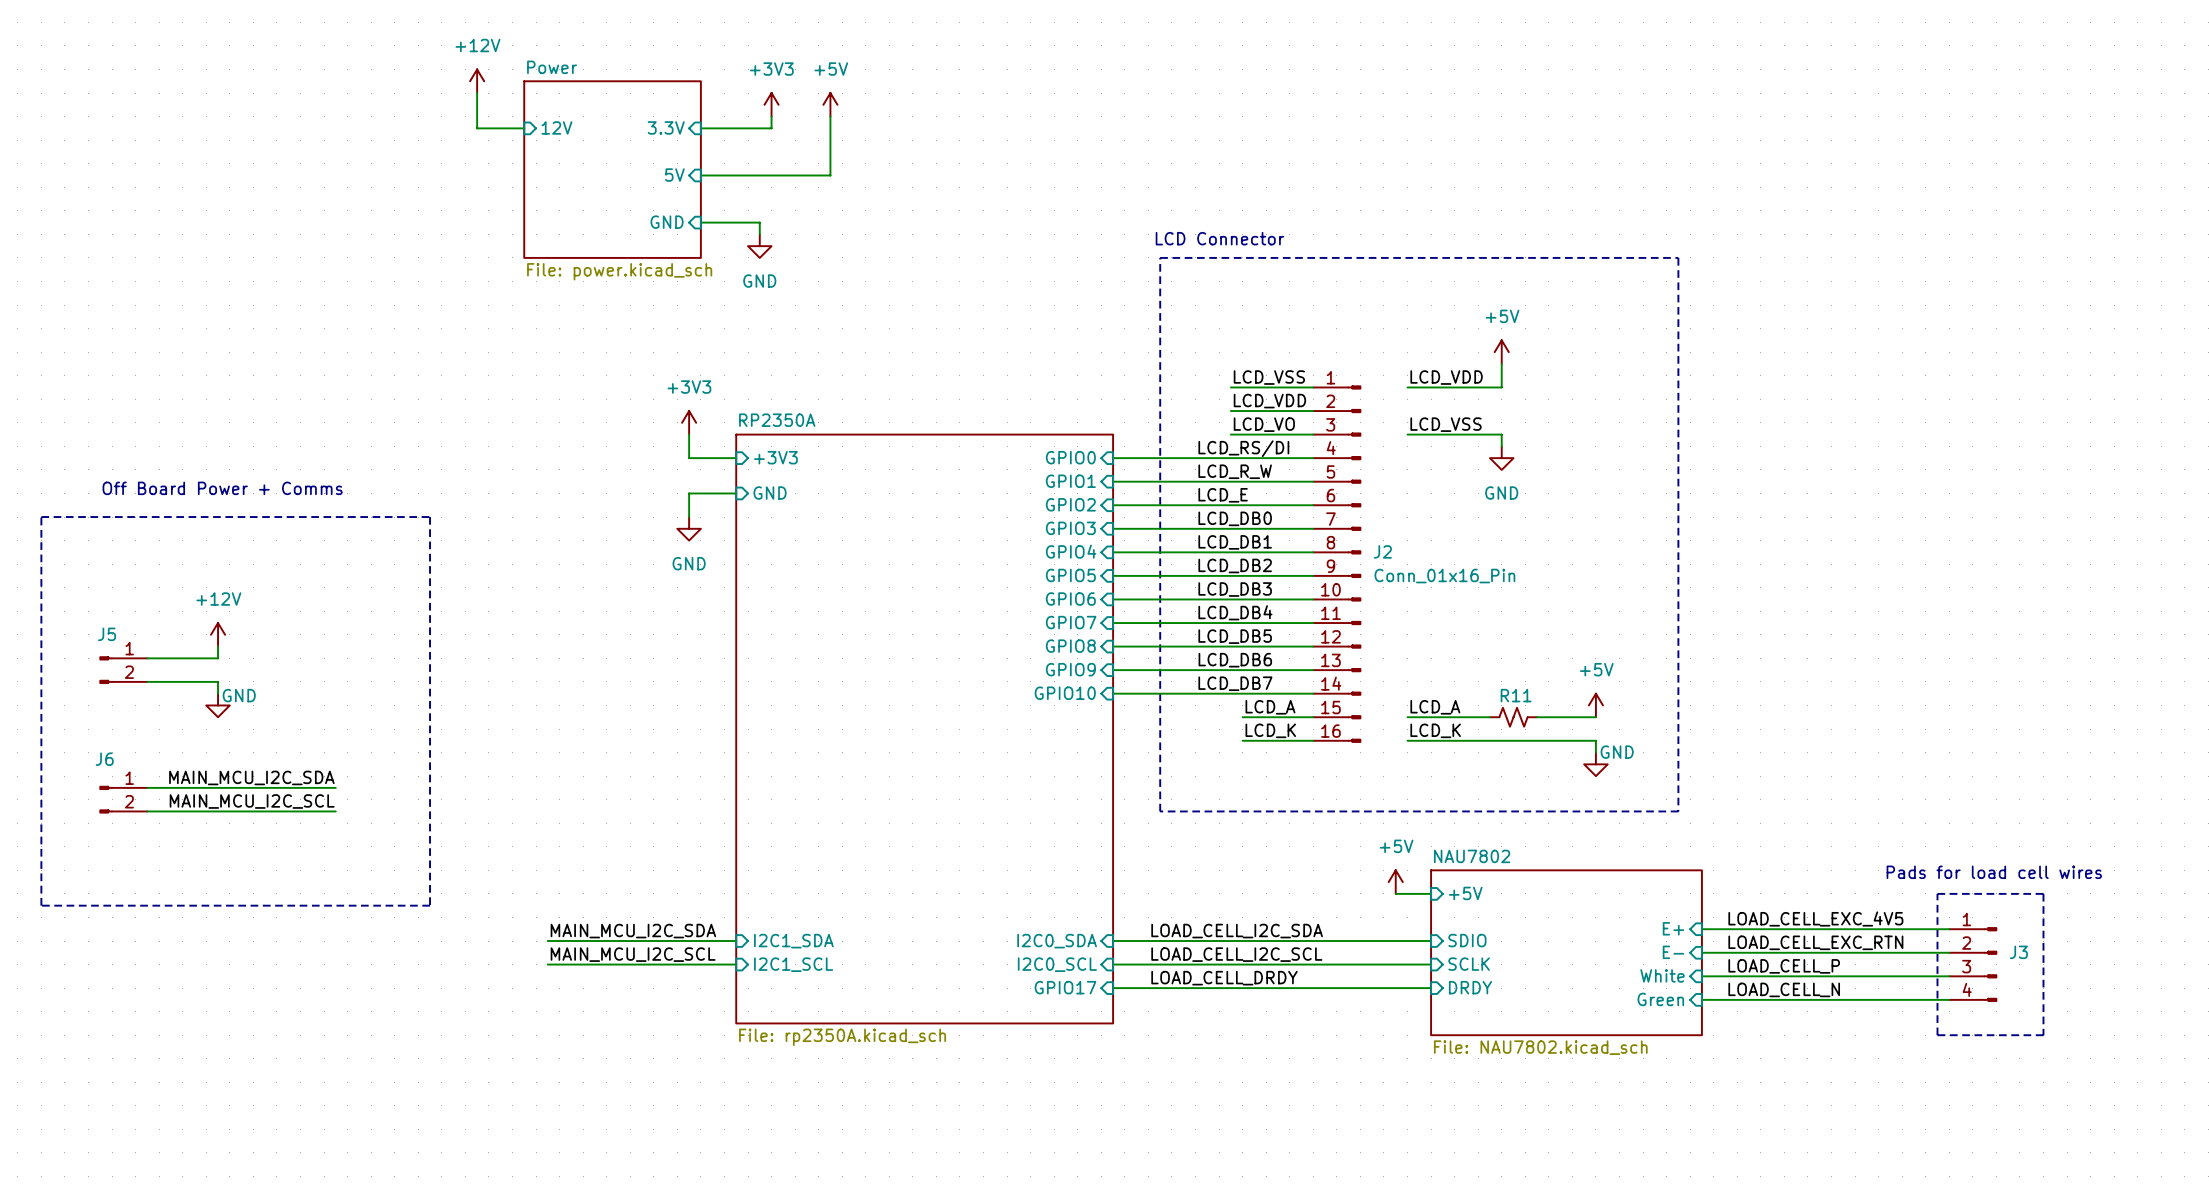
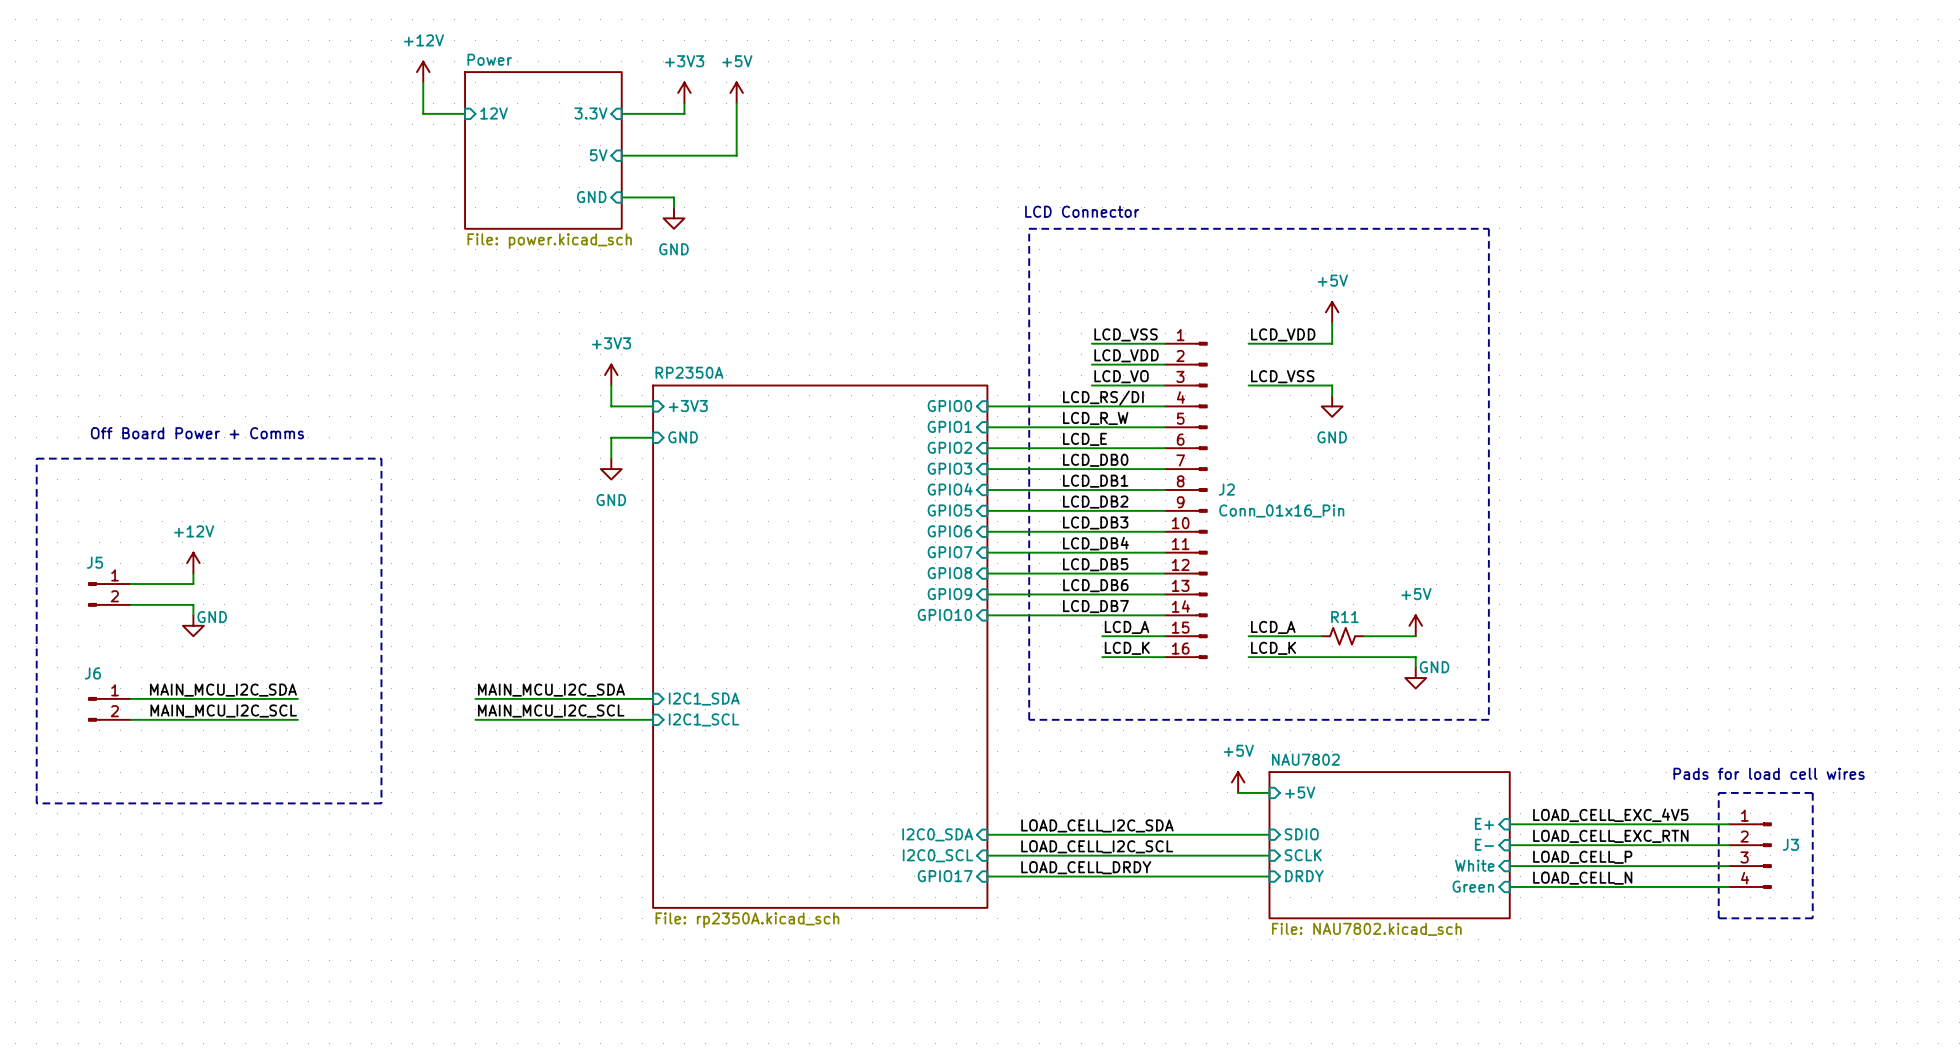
wire: none -> (475, 698) (653, 698)
wire: none -> (475, 719) (653, 719)
label position: MAIN_MCU_I2C_SDA (633, 931) -> MAIN_MCU_I2C_SDA (551, 690)
wire: (547, 941) (736, 941) -> none
sheet pin position: I2C1_SDA (793, 941) -> I2C1_SDA (704, 699)
label position: MAIN_MCU_I2C_SCL (633, 954) -> MAIN_MCU_I2C_SCL (551, 711)
wire: (547, 964) (736, 964) -> none
sheet pin position: I2C1_SCL (793, 964) -> I2C1_SCL (703, 719)

